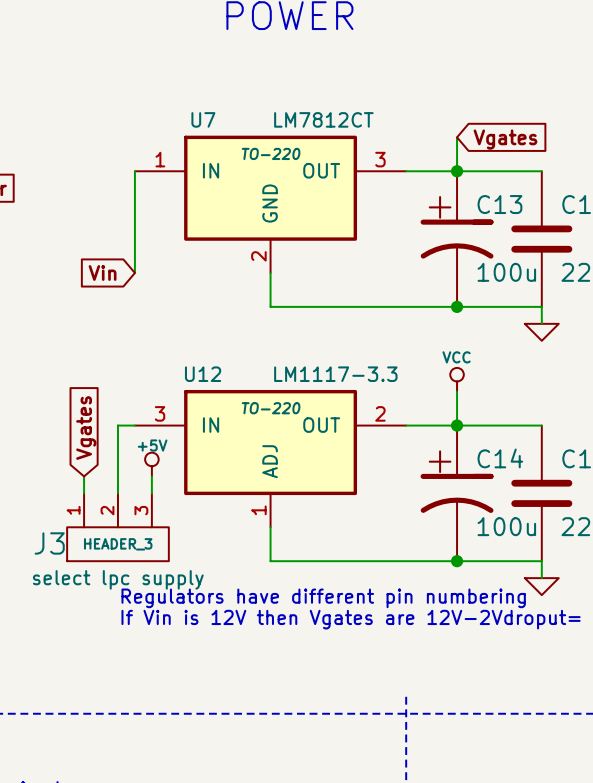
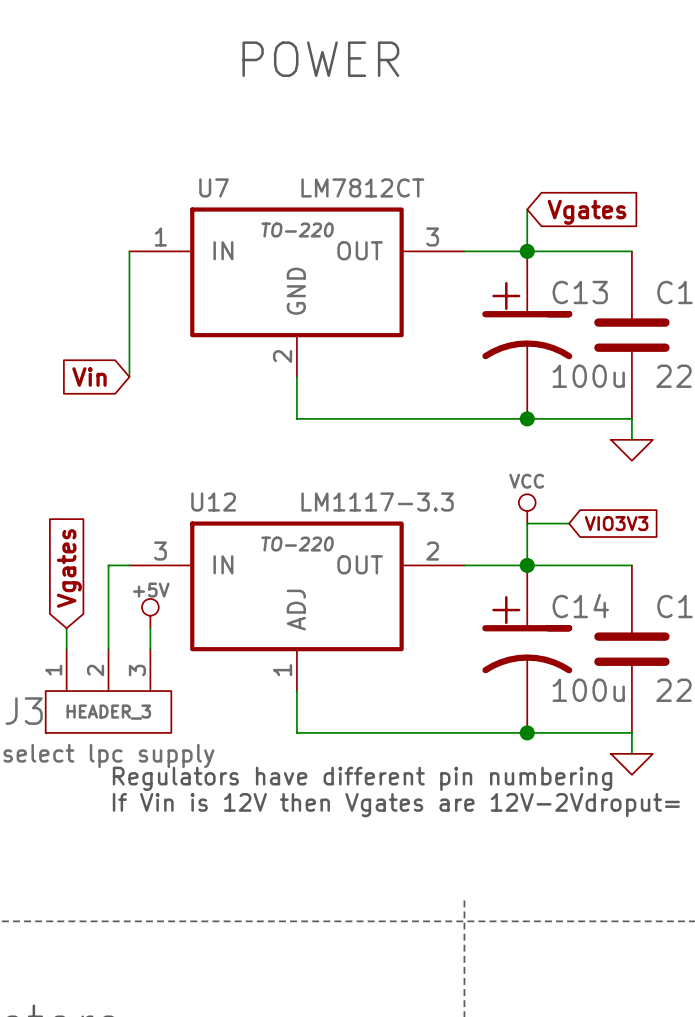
wire: none -> (527, 523) (569, 523)
global label: none -> VIO3V3 (616, 523)

